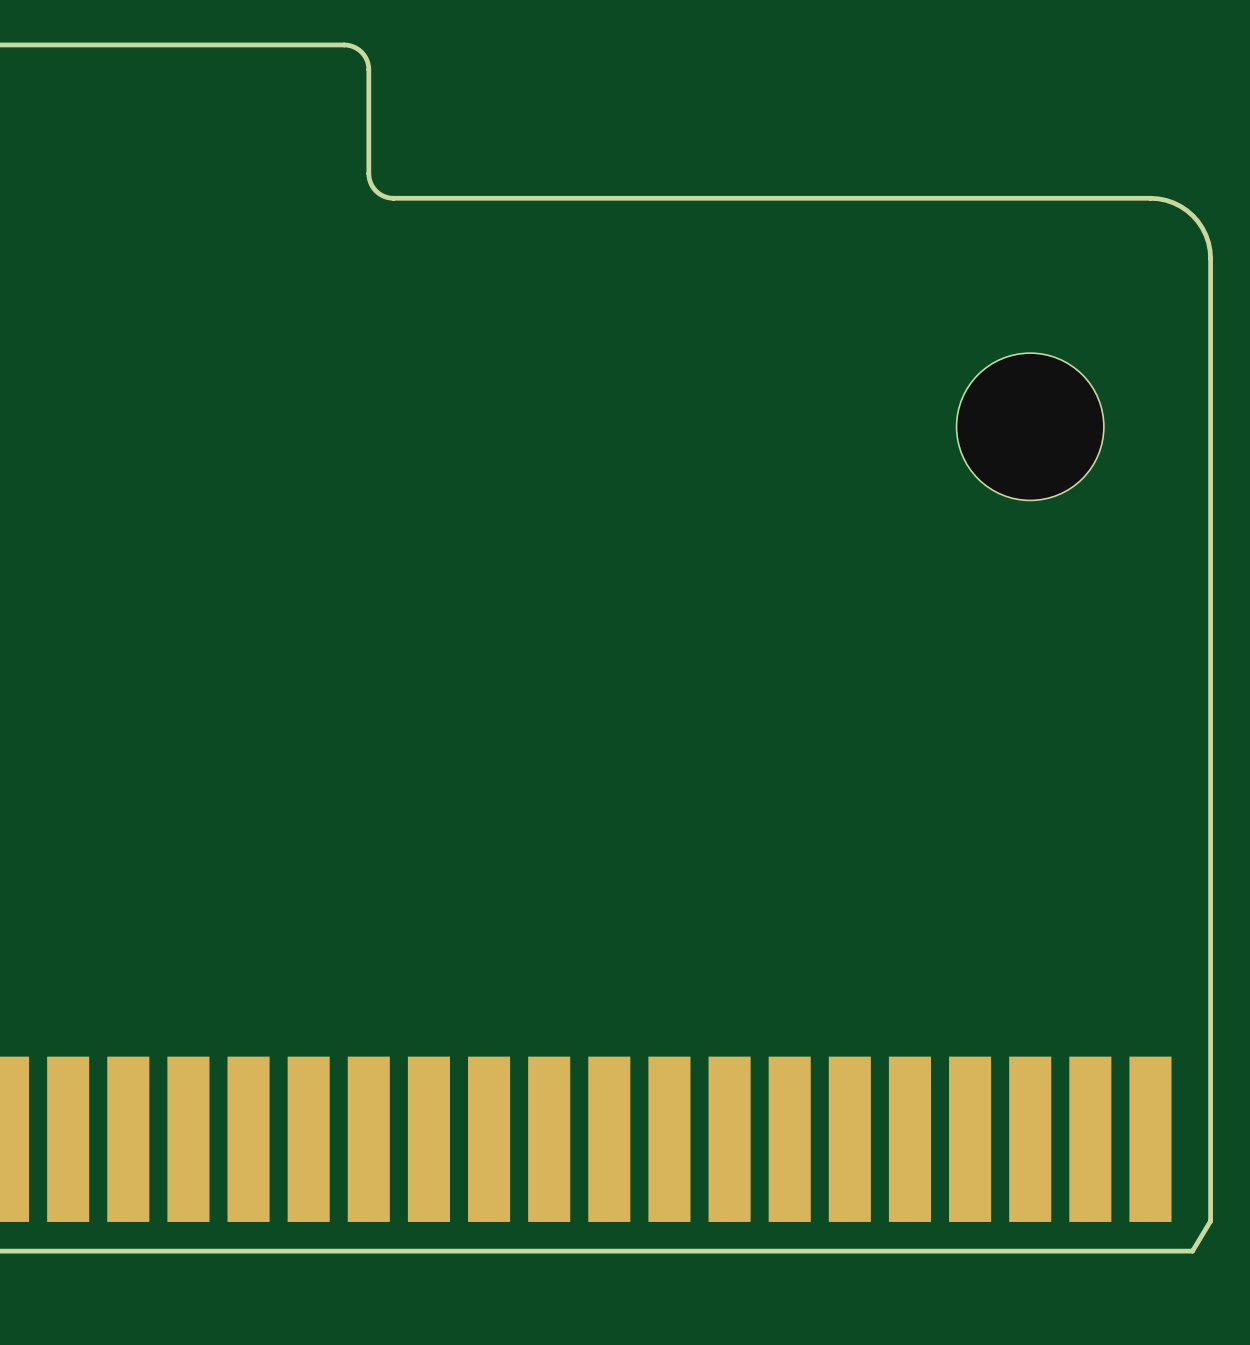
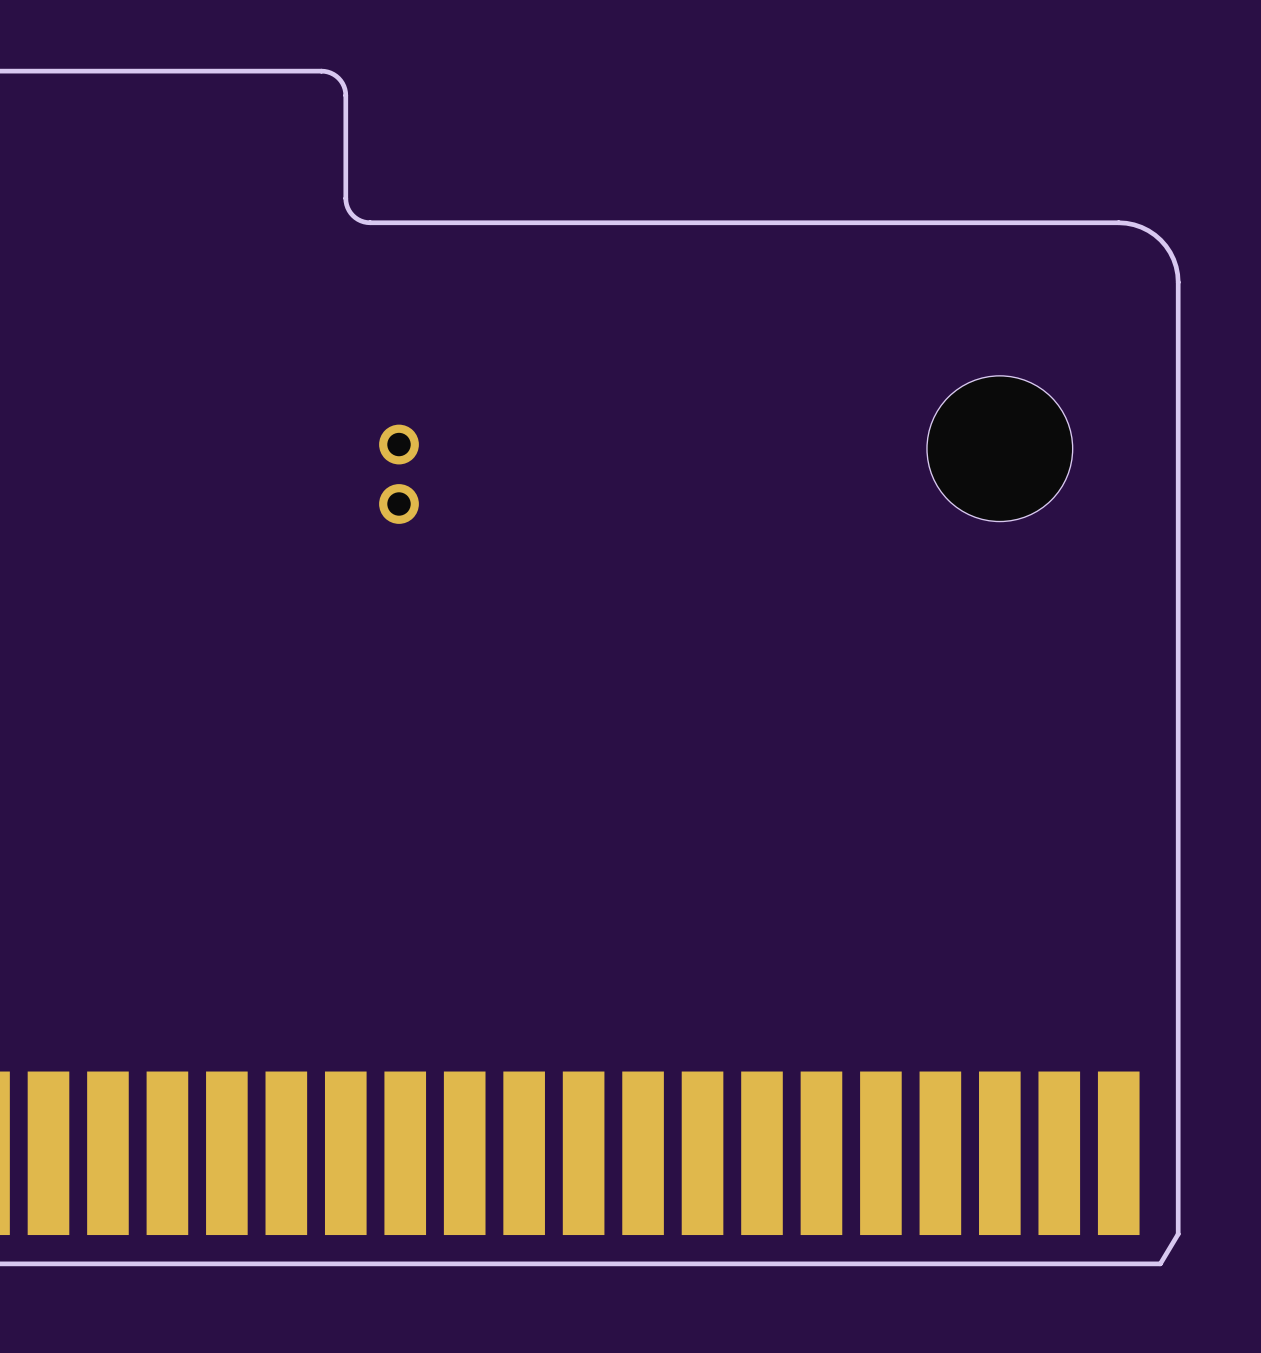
part: none -> (399, 474)

